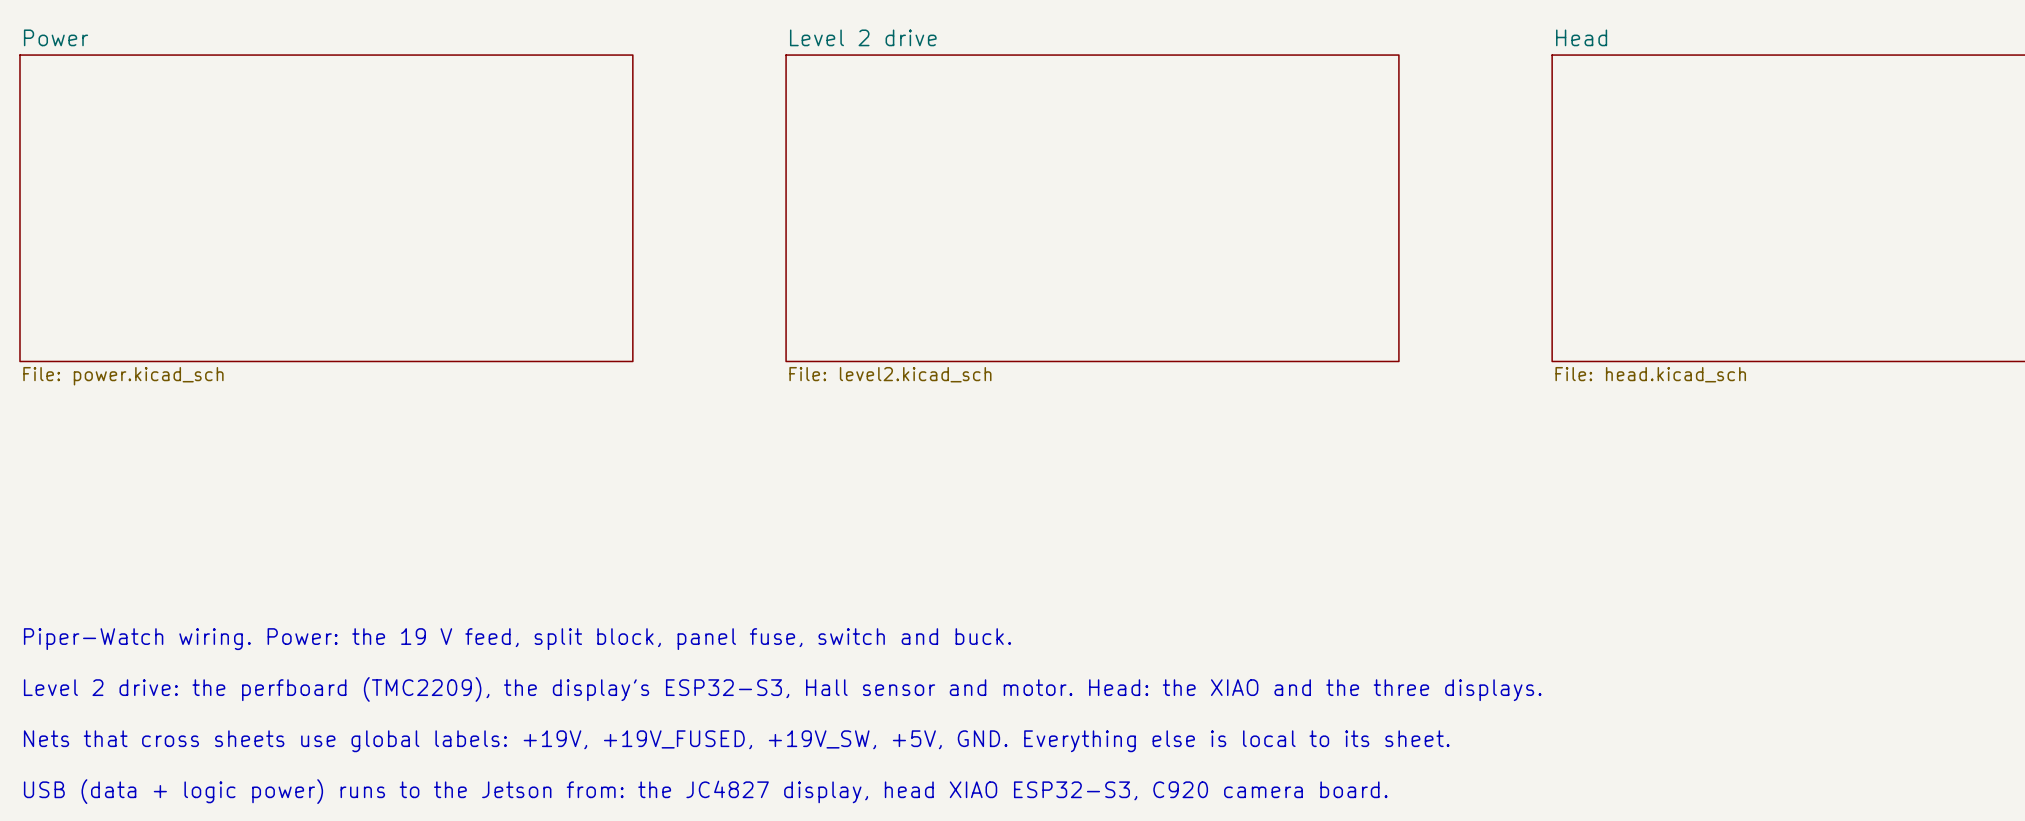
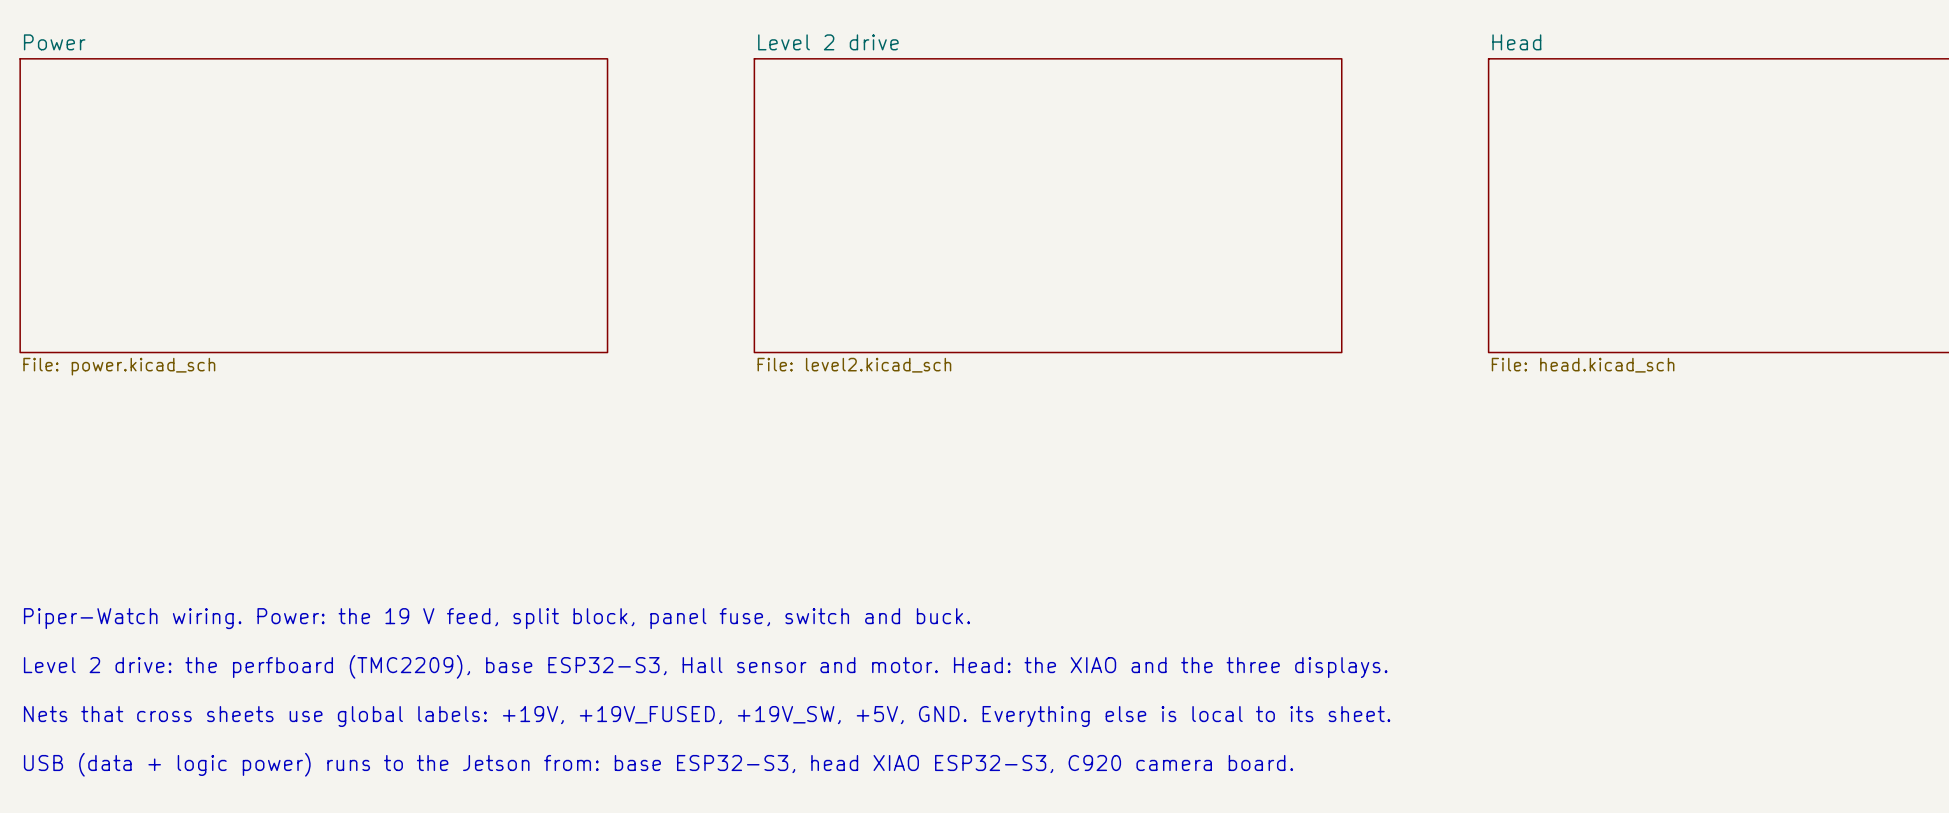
text: Level 2 drive: the perfboard (TMC2209), the display's ESP32-S3, Hall sensor and motor. Head: the XIAO and the three displays. (782, 689) -> Level 2 drive: the perfboard (TMC2209), base ESP32-S3, Hall sensor and motor. Head: the XIAO and the three displays. (705, 666)
text: USB (data + logic power) runs to the Jetson from: the JC4827 display, head XIAO ESP32-S3, C920 camera board. (705, 791) -> USB (data + logic power) runs to the Jetson from: base ESP32-S3, head XIAO ESP32-S3, C920 camera board. (658, 764)

